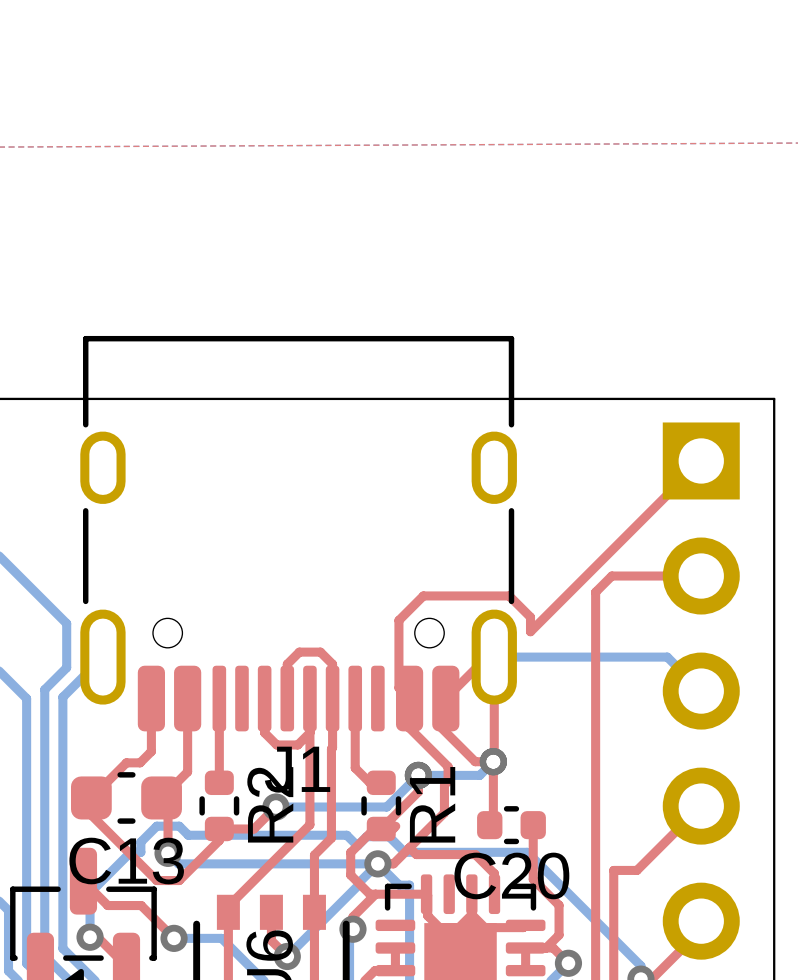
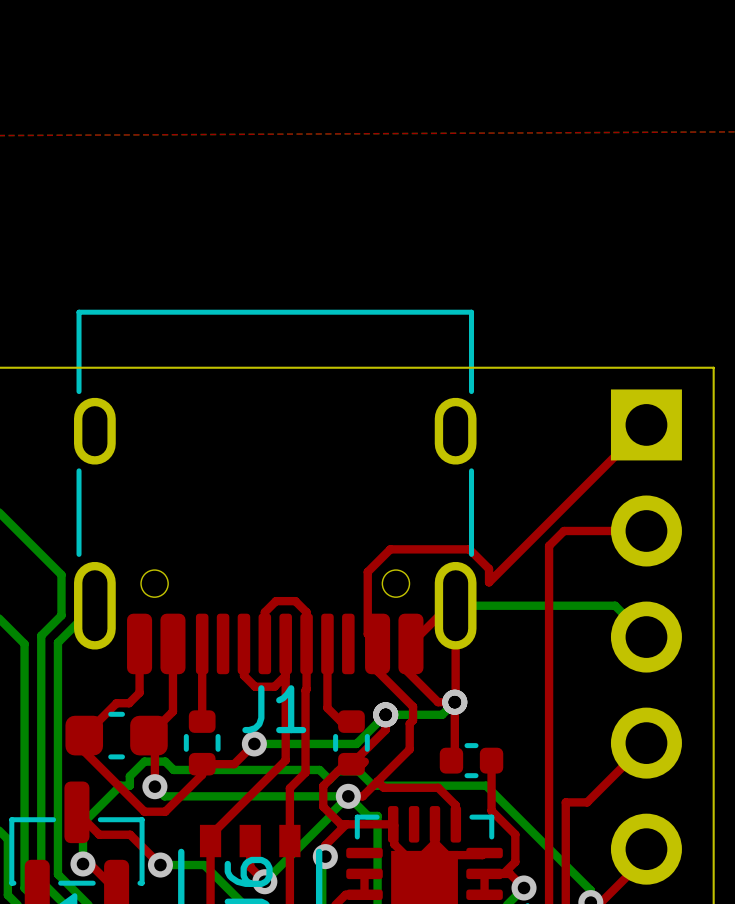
R2 name: R2 (270, 804) -> none
R1 name: R1 (432, 804) -> none
C13 name: C13 (126, 861) -> none
C20 name: C20 (511, 875) -> none

